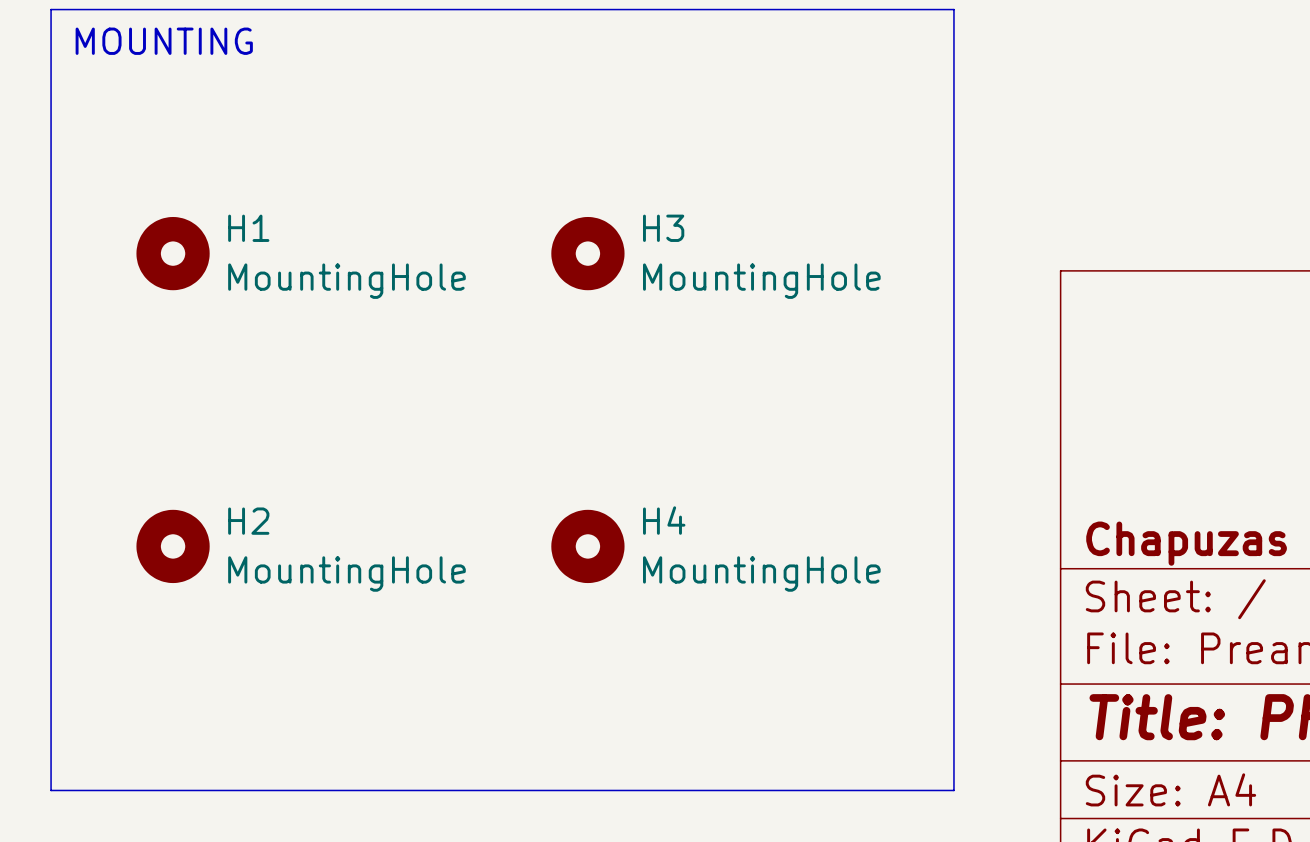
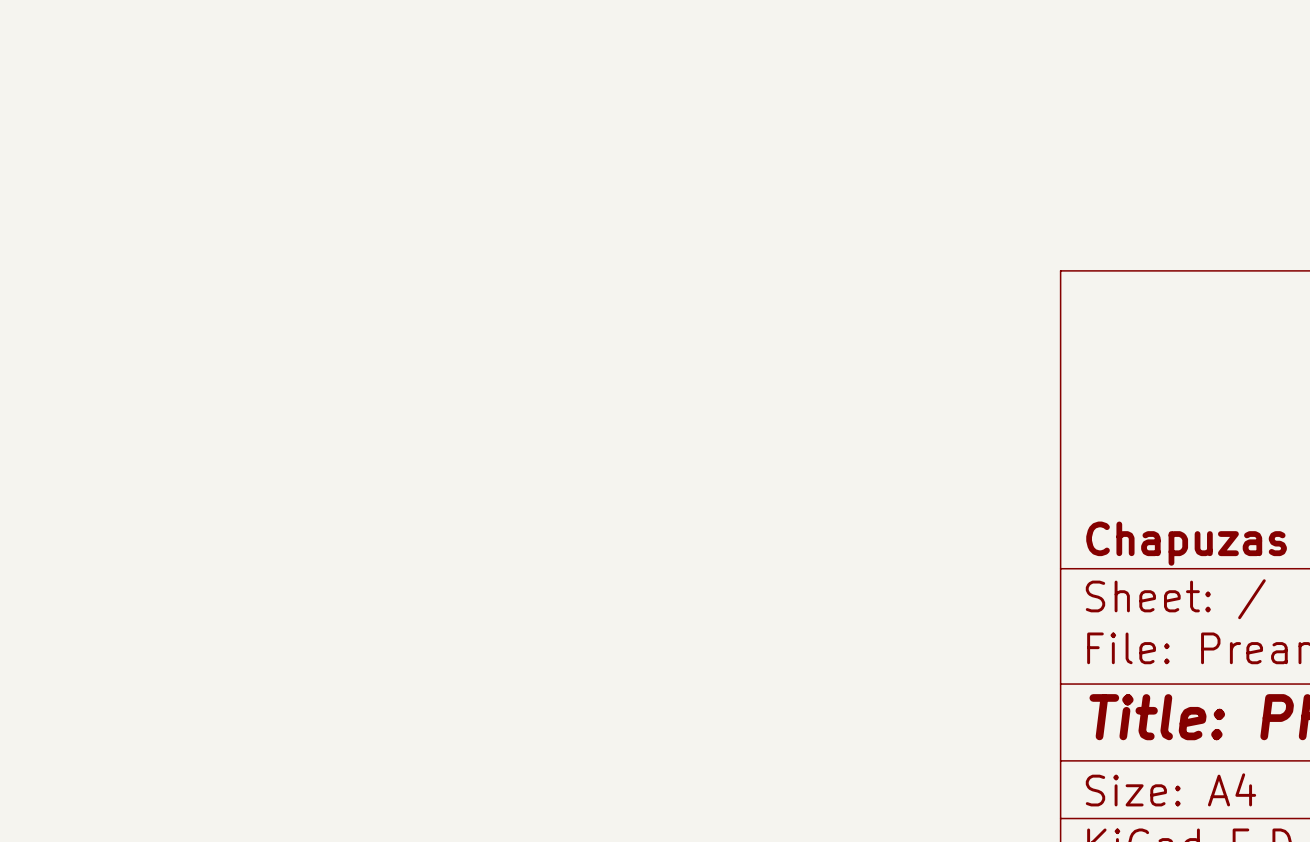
line: (51, 9) (953, 9) (953, 790) (51, 790) (51, 9) -> none
text: MOUNTING (164, 41) -> none
H1: MountingHole (173, 253) -> none
H3: MountingHole (587, 253) -> none
H2: MountingHole (173, 546) -> none
H4: MountingHole (587, 546) -> none

